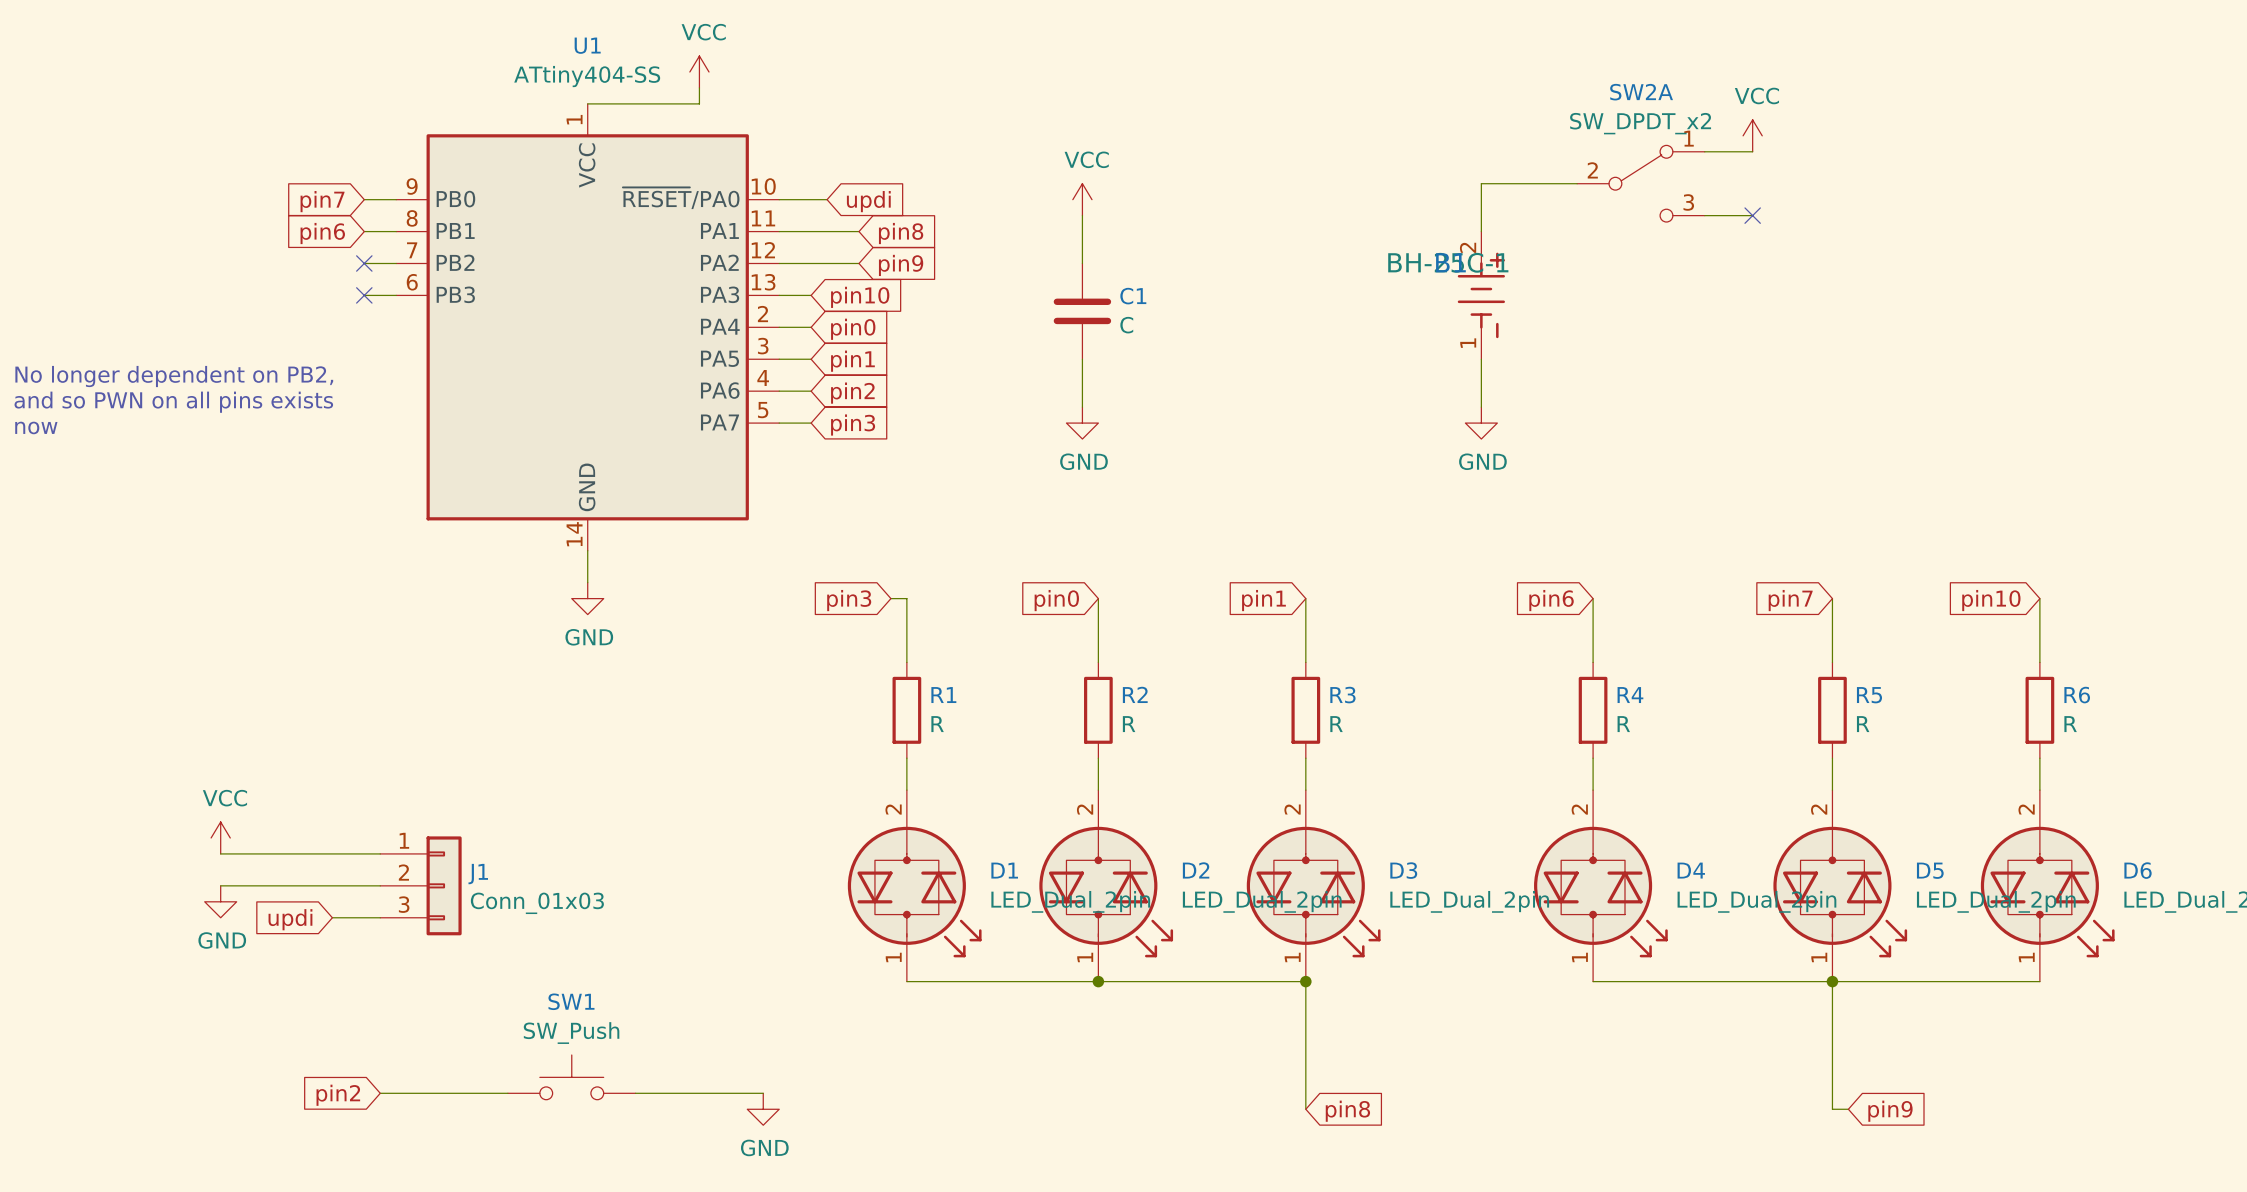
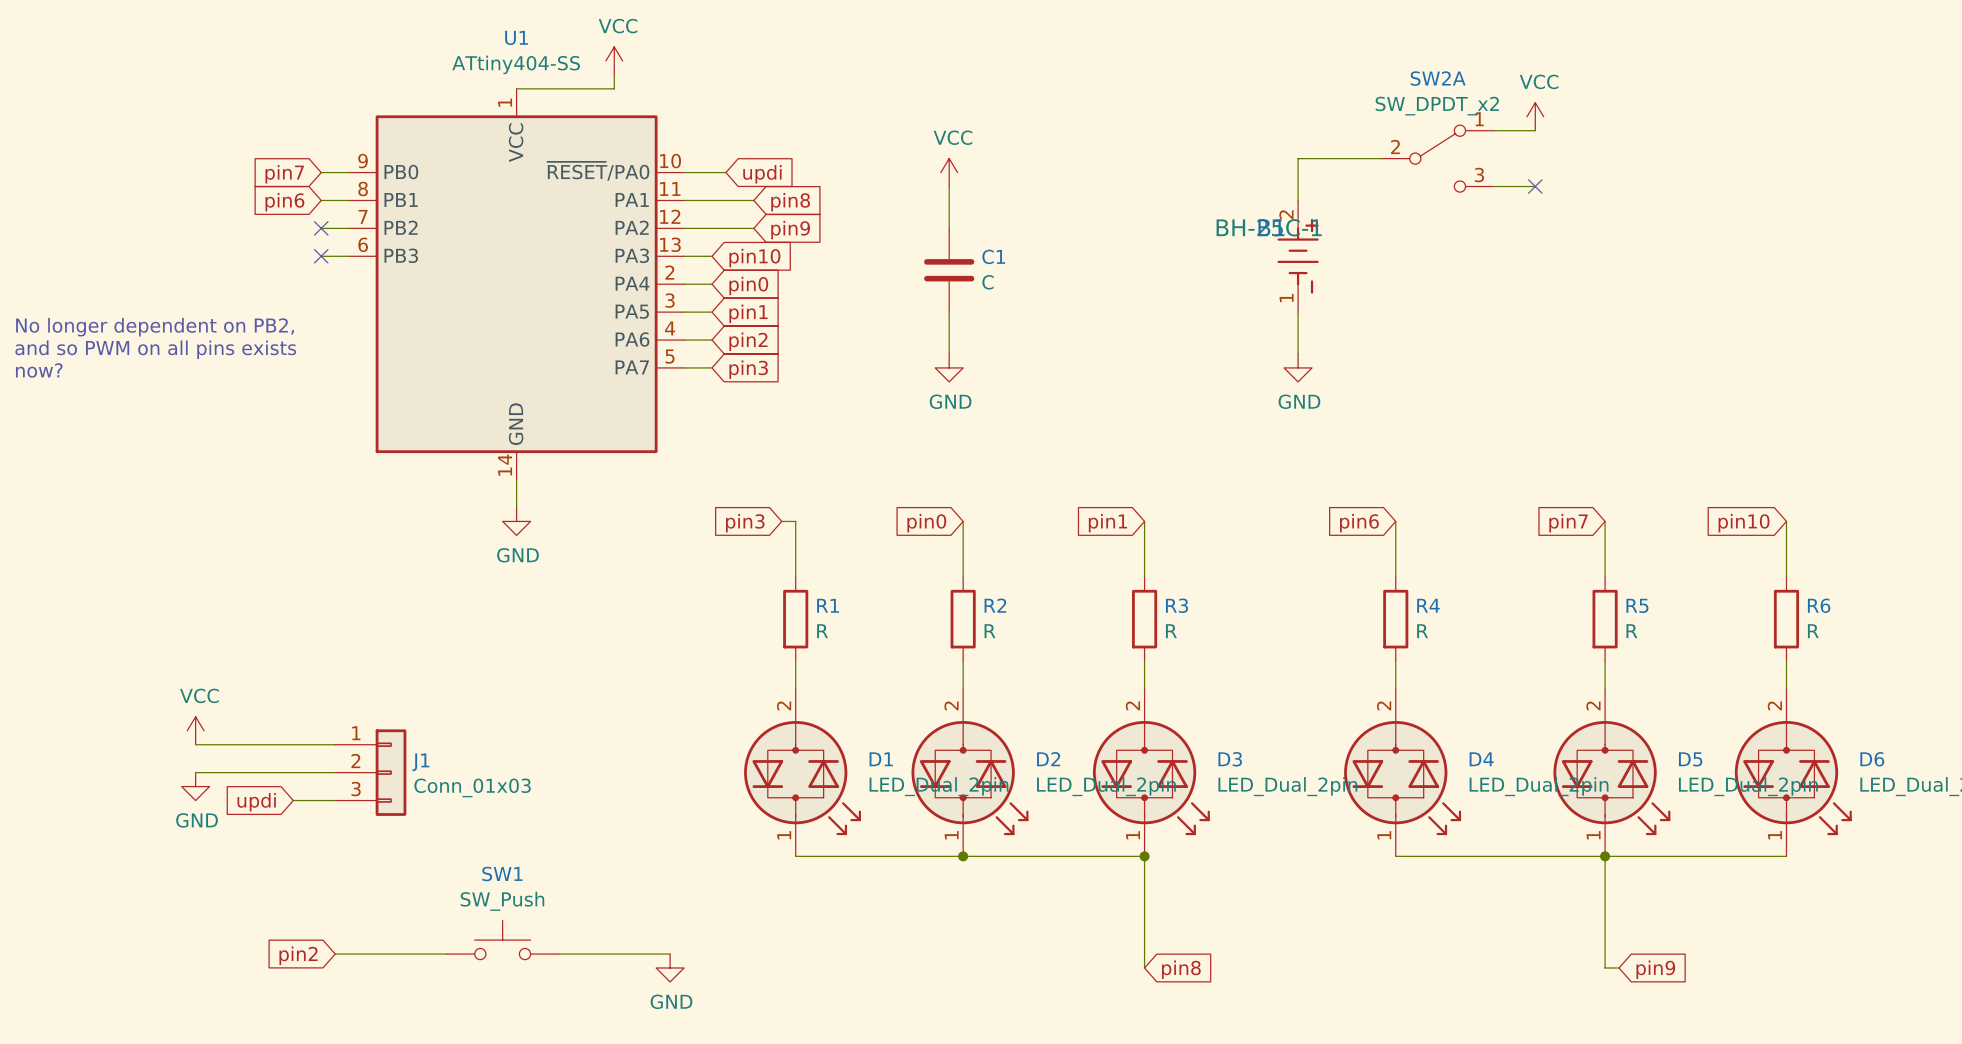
text: and so PWN on all pins exists (173, 402) -> and so PWM on all pins exists (155, 349)
text: now (36, 427) -> now? (39, 370)

